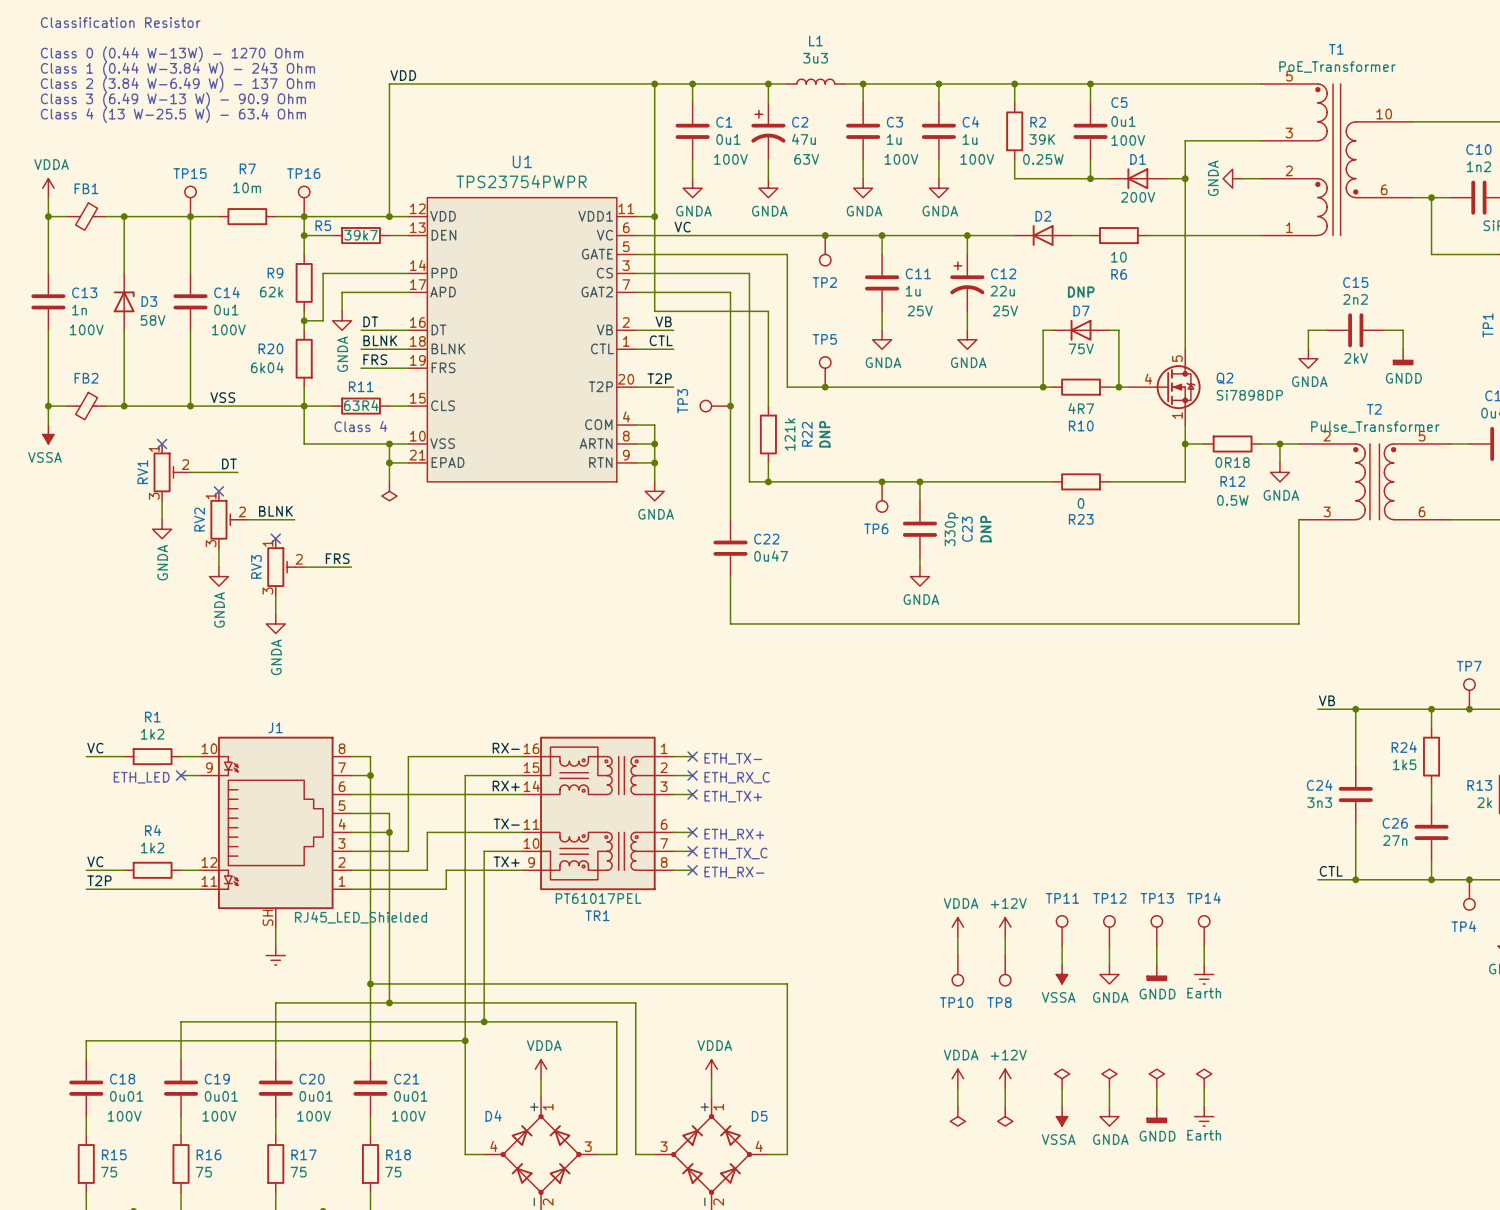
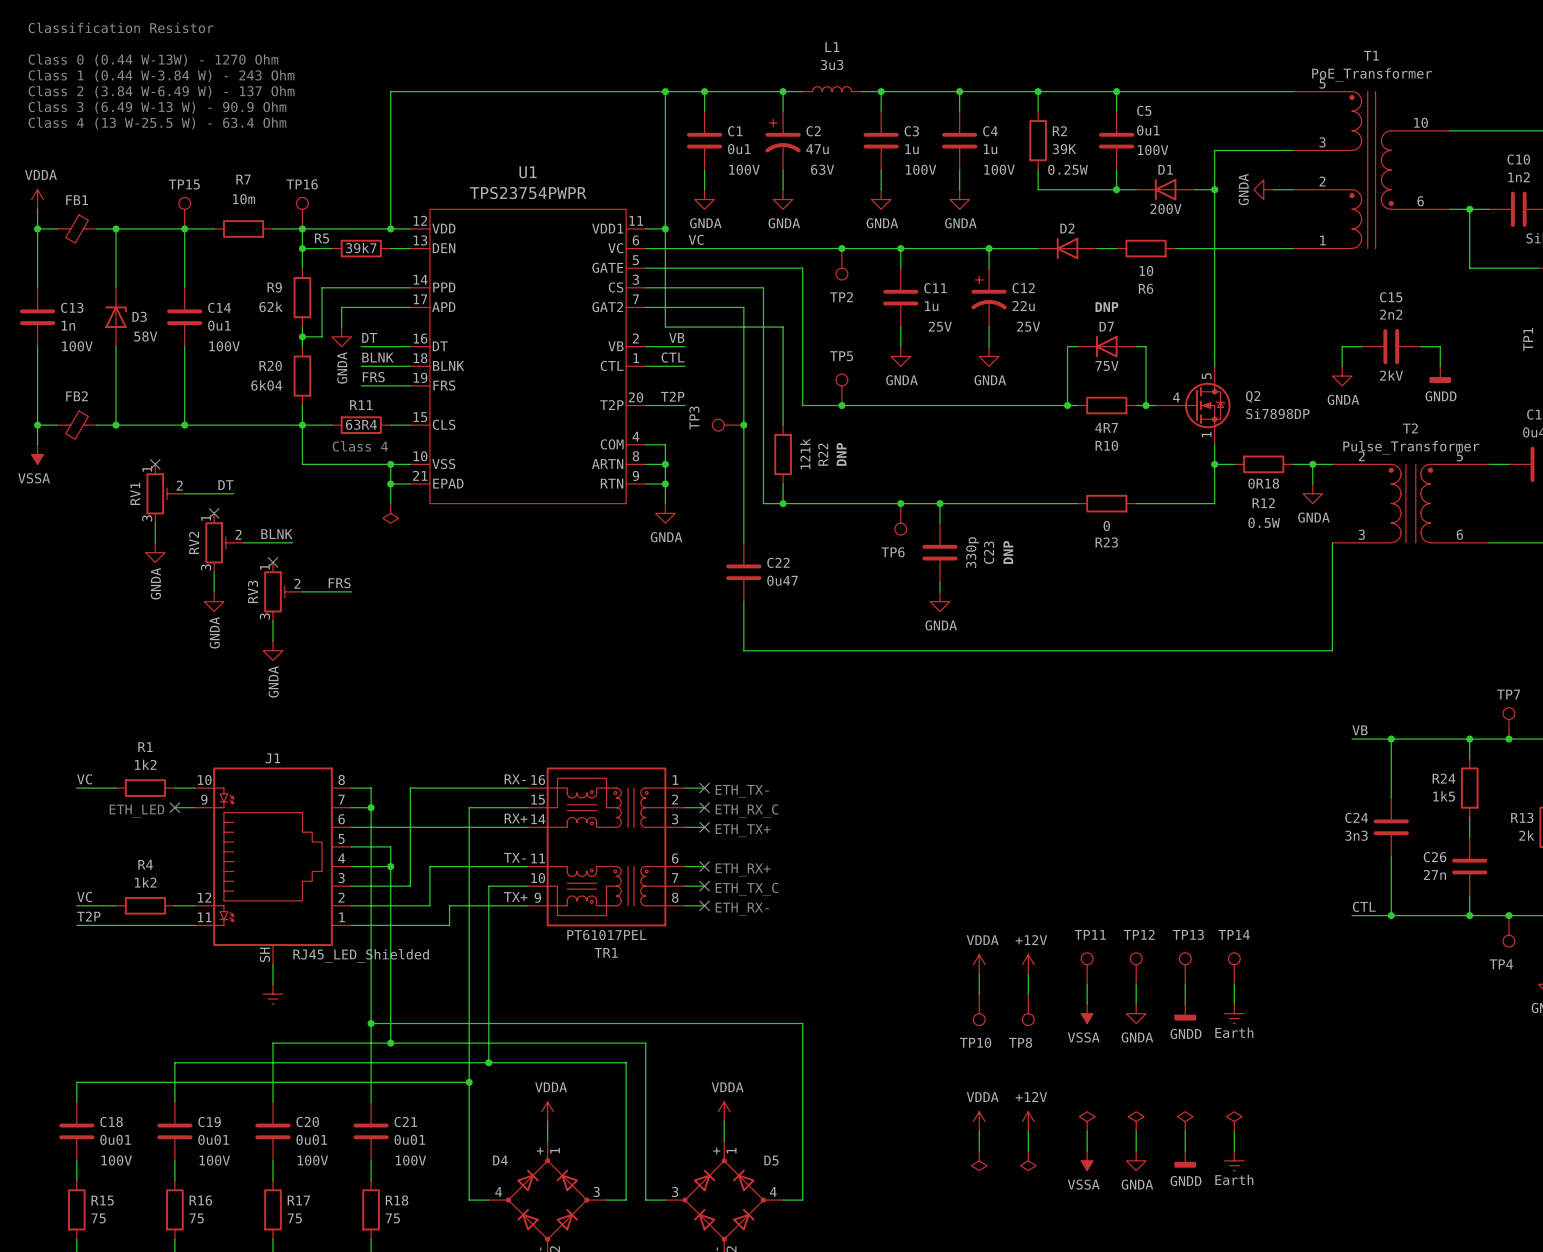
label: VDD (403, 75) -> none
label: VSS (222, 397) -> none

